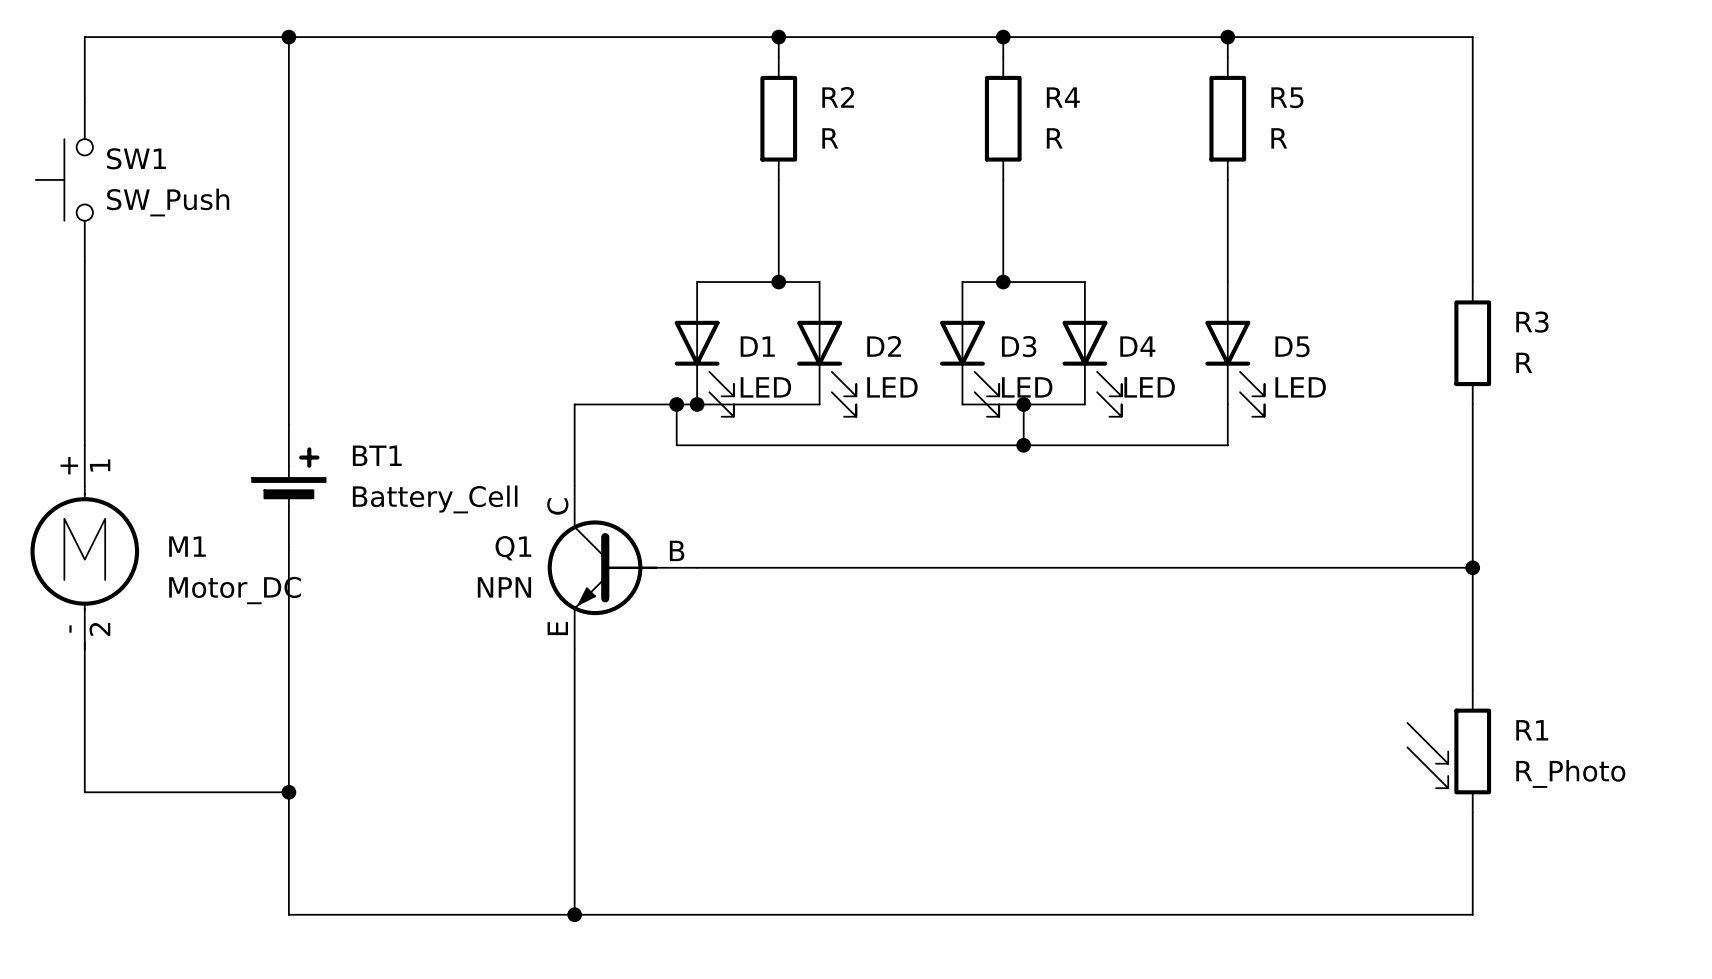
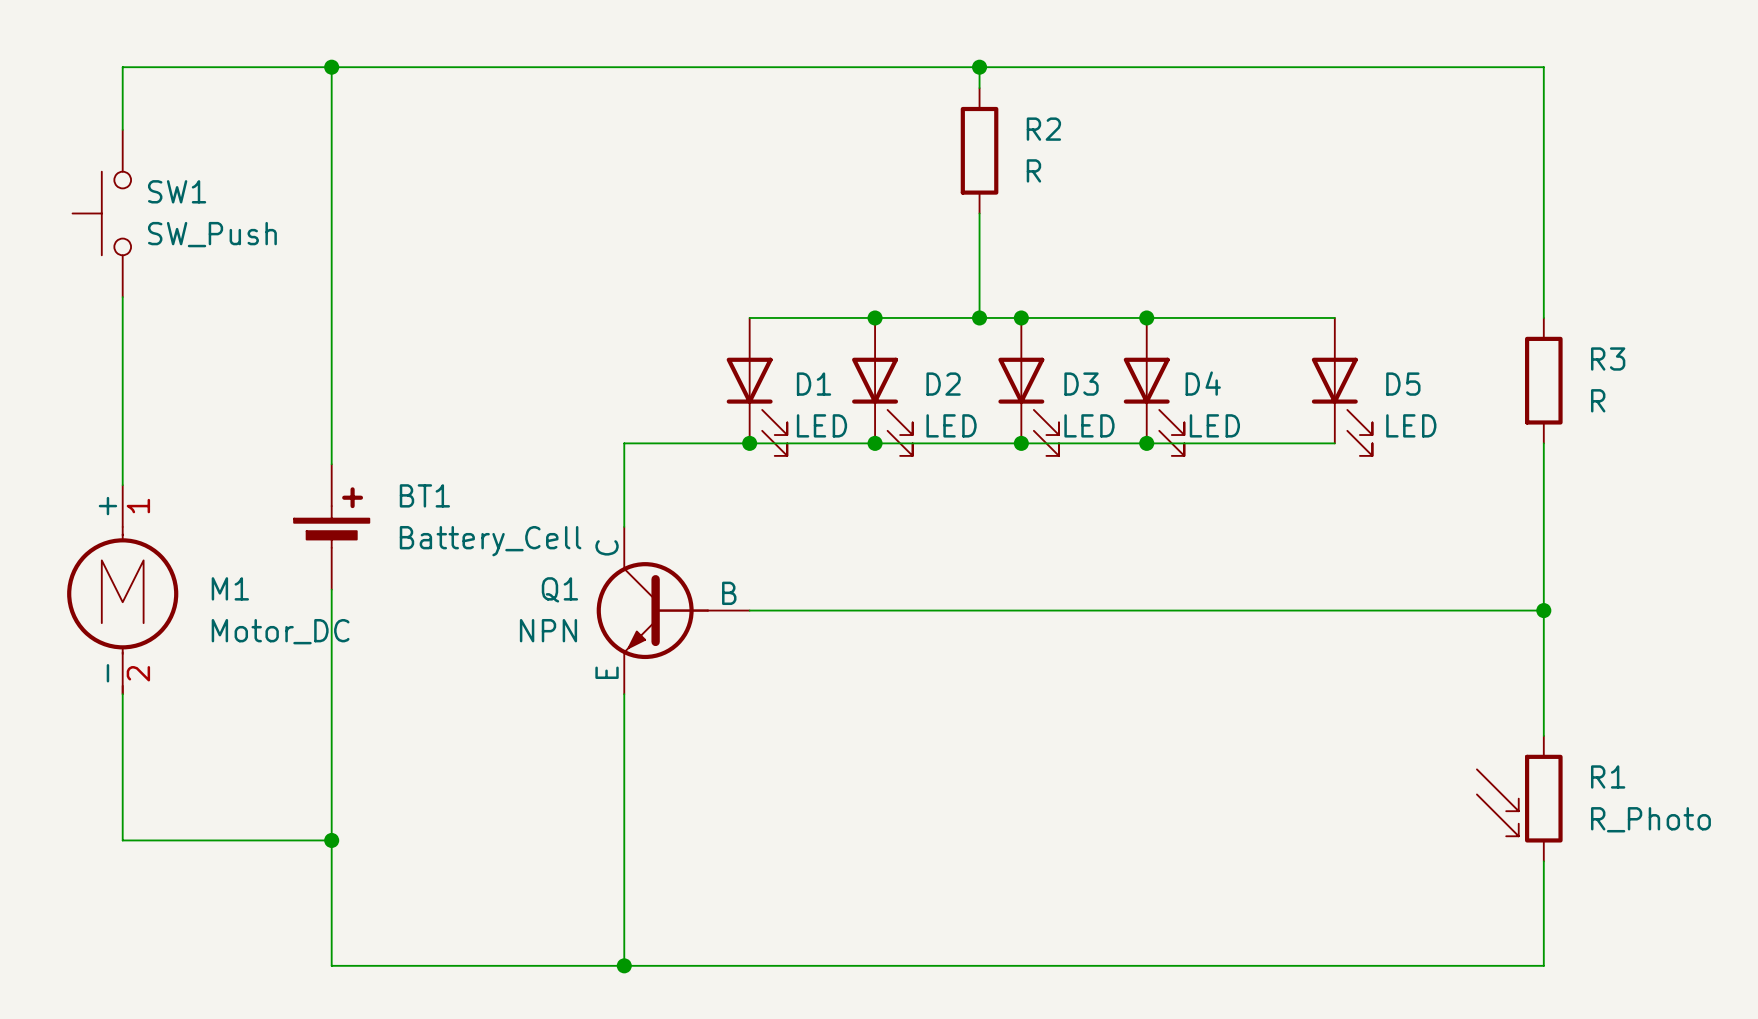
wire: (778, 37) (778, 57) -> none
junction: (778, 37) -> none
junction: none -> (979, 67)
wire: (1003, 37) (1003, 57) -> (979, 67) (979, 88)
junction: (1003, 37) -> none
wire: (1227, 37) (1227, 57) -> none
junction: (1227, 37) -> none
R2 position: (778, 118) -> (979, 150)
R4: R (1003, 118) -> none
R5: R (1227, 118) -> none
wire: (778, 179) (778, 282) -> none
wire: (1003, 179) (1003, 282) -> (979, 213) (979, 317)
wire: (1227, 179) (1227, 282) -> none
junction position: (778, 282) -> (875, 317)
wire: none -> (875, 317) (1021, 317)
junction: none -> (979, 317)
junction: none -> (1021, 317)
junction: (1003, 282) -> none
wire: none -> (1146, 317) (1334, 317)
junction: none -> (1146, 317)
D5 position: (1234, 349) -> (1342, 386)
wire: (676, 404) (676, 445) (1227, 445) (1227, 404) -> none
junction: (676, 404) -> none
wire: none -> (875, 443) (1021, 443)
junction: none -> (875, 443)
junction: none -> (1021, 443)
wire: (1023, 404) (1023, 445) -> none
junction: (1023, 404) -> none
wire: none -> (1146, 443) (1334, 443)
junction: none -> (1146, 443)
junction: (1023, 445) -> none

